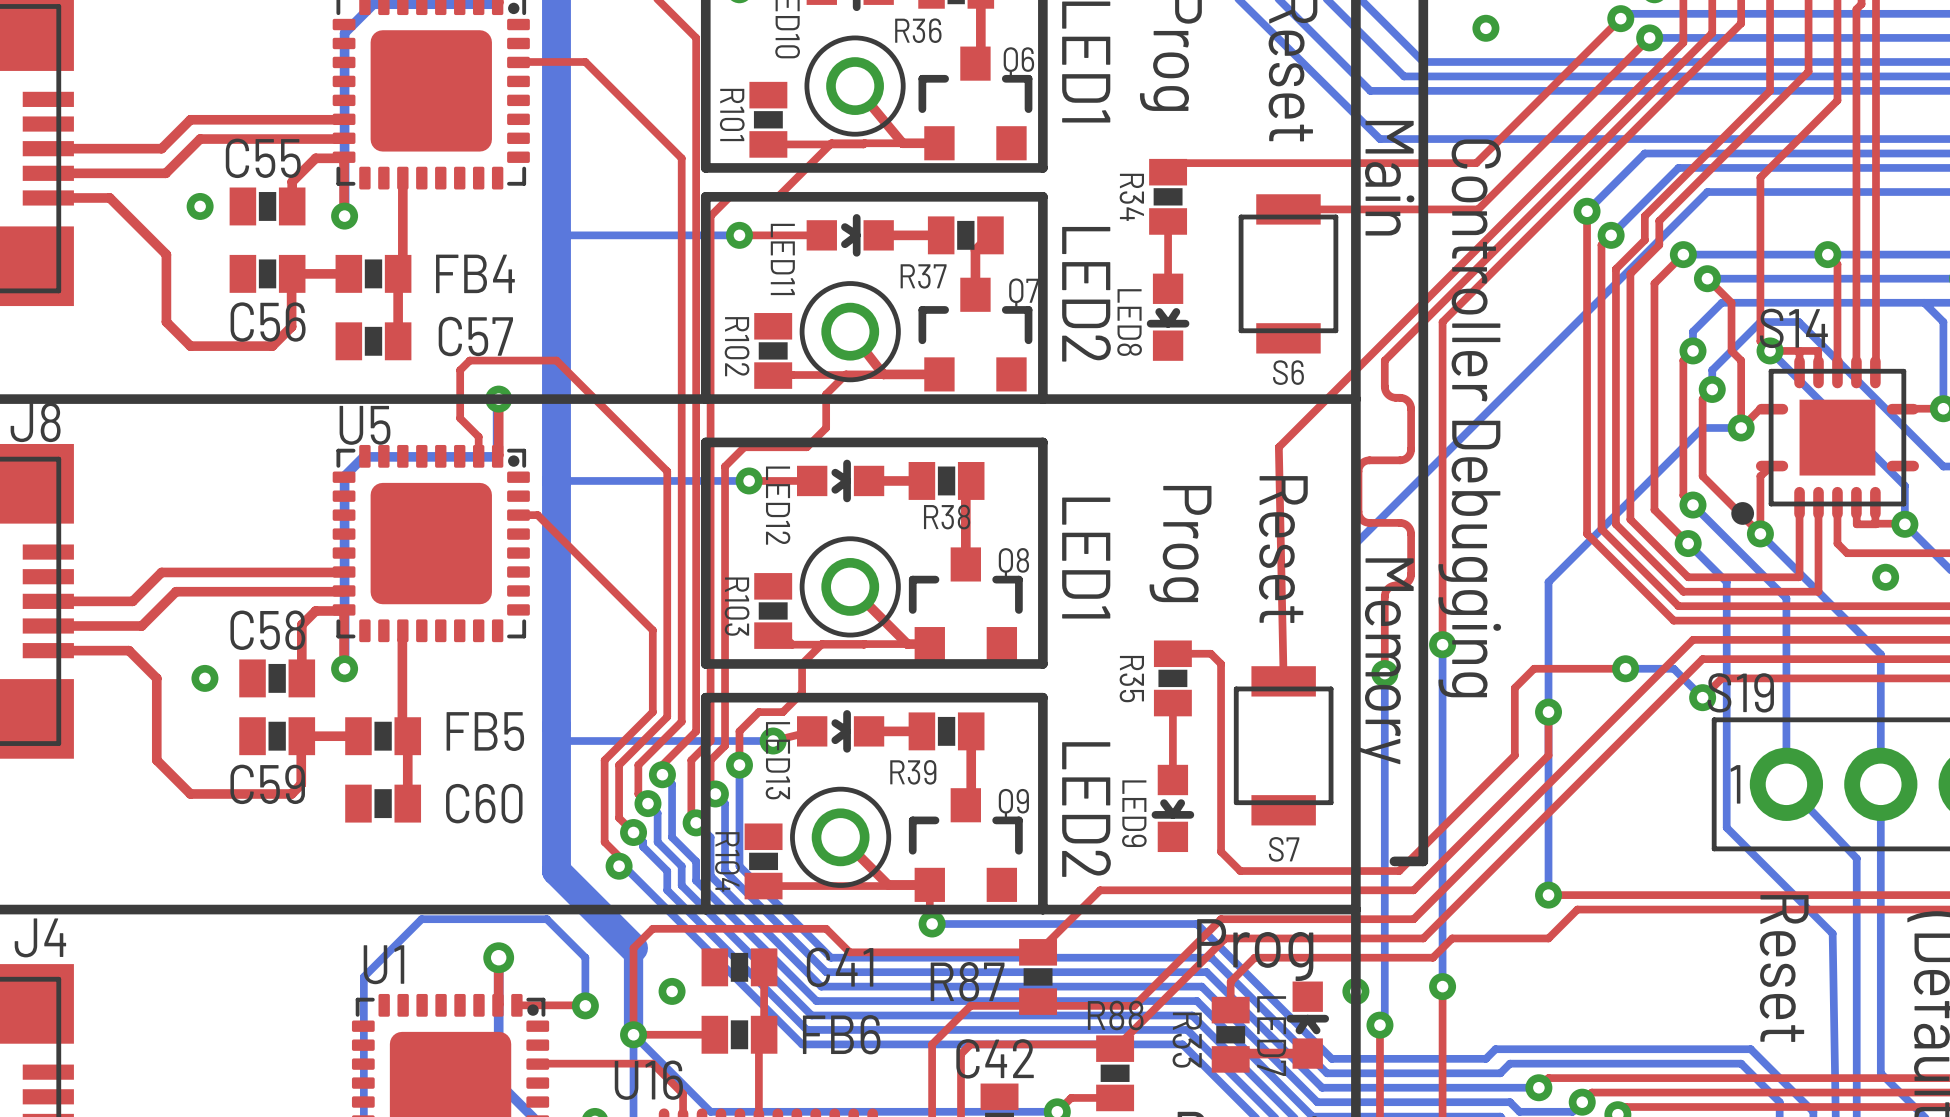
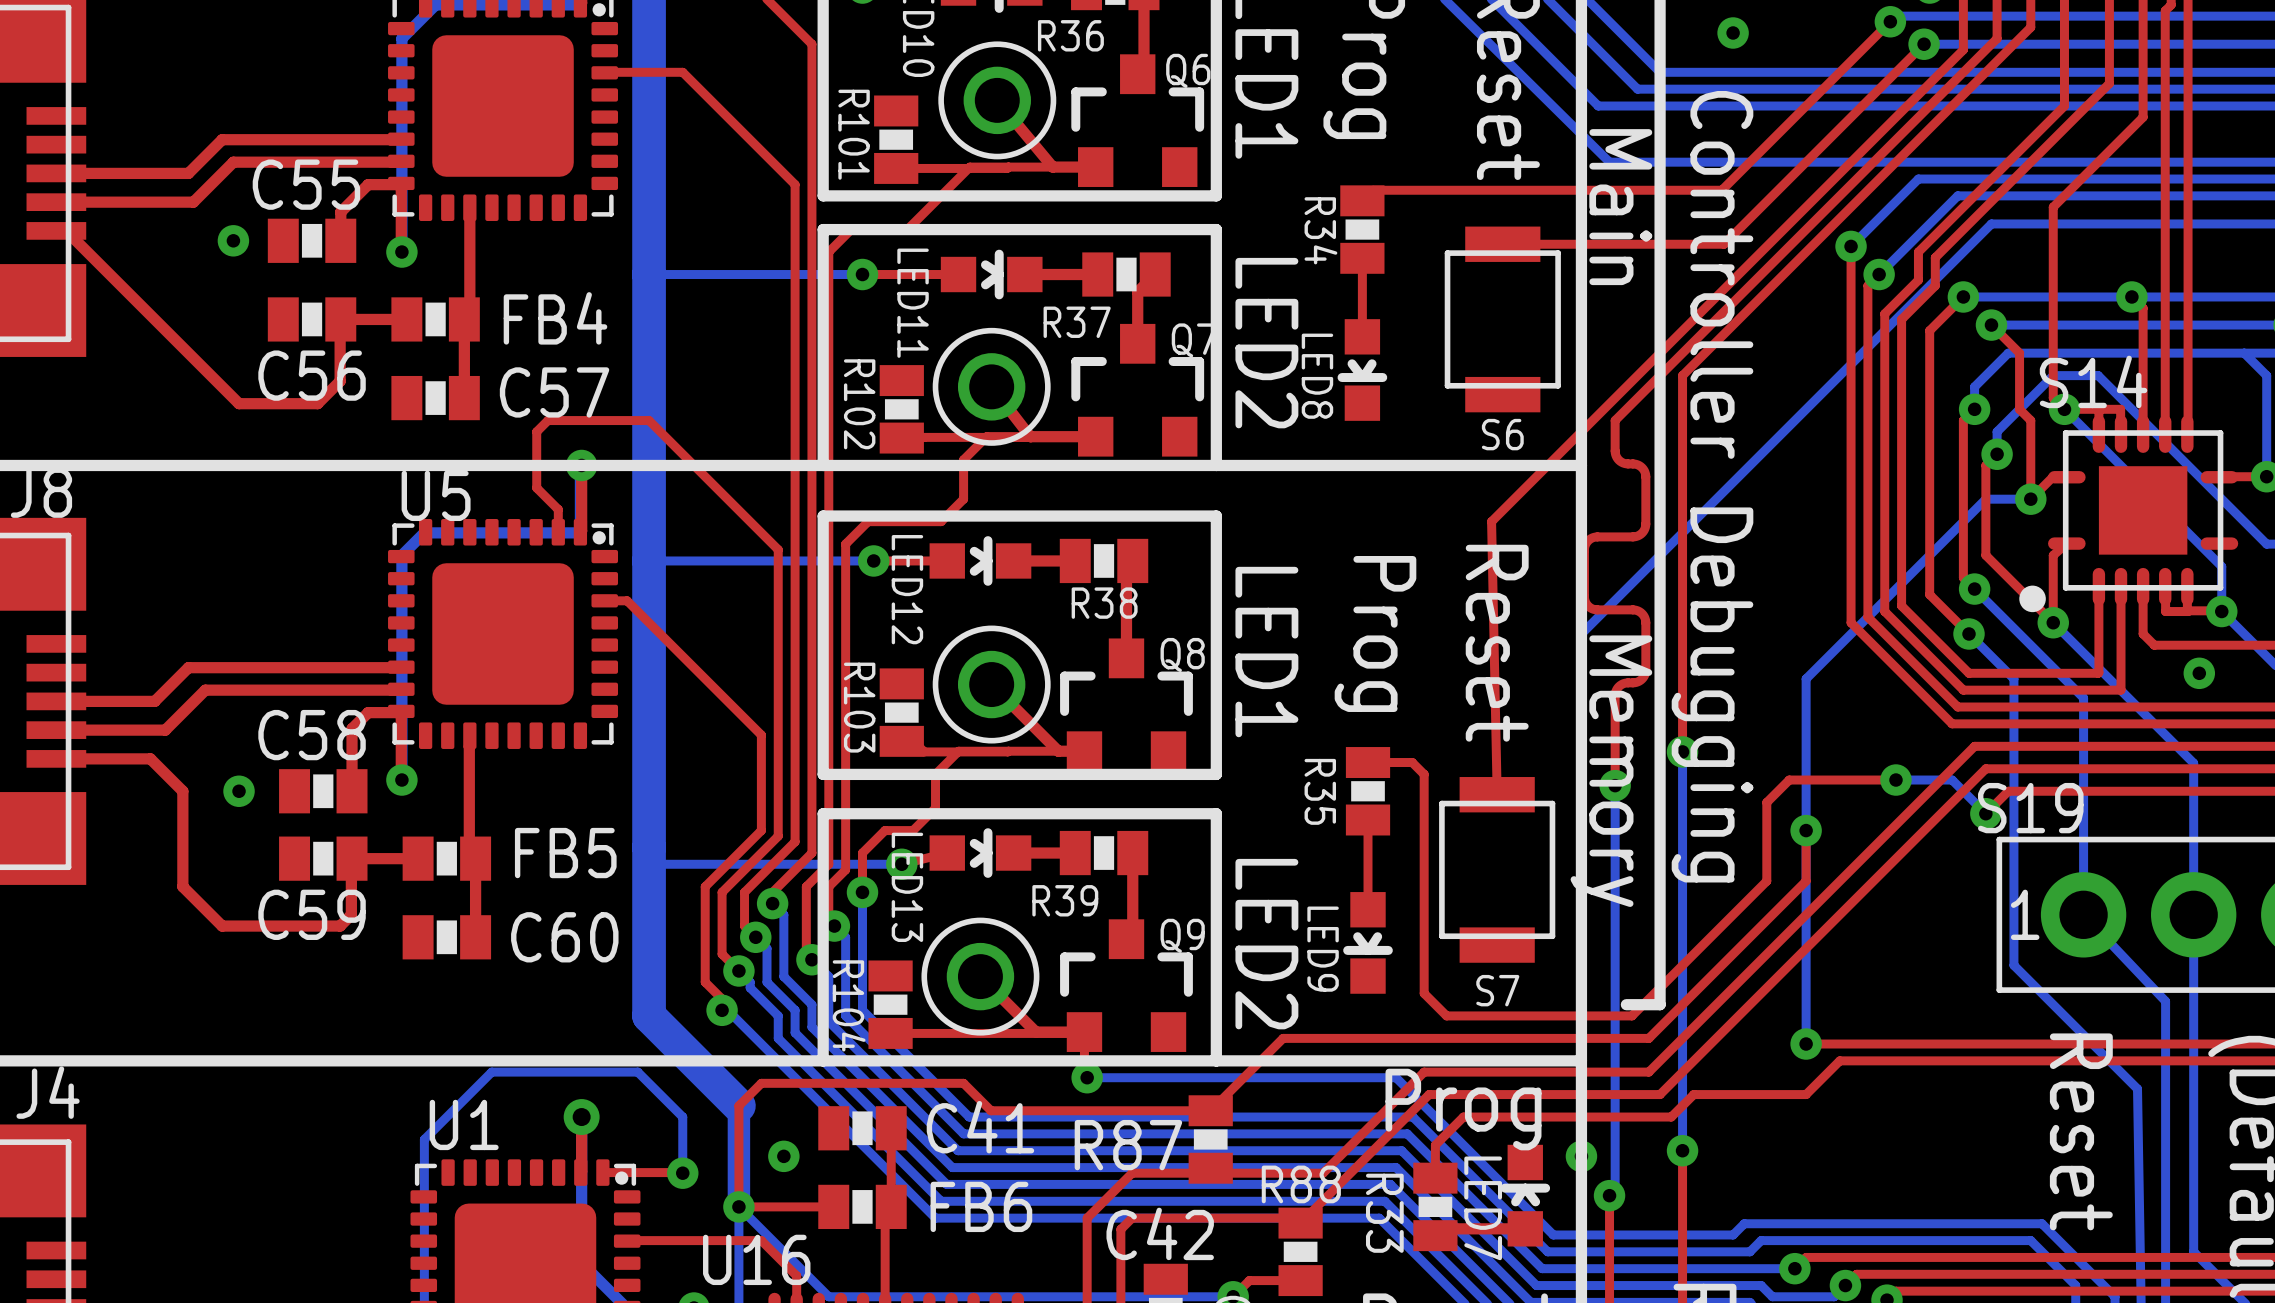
top track: (56, 197) (109, 197) (166, 254) (166, 322) (190, 346) (204, 346) -> (66, 230) (239, 403)

